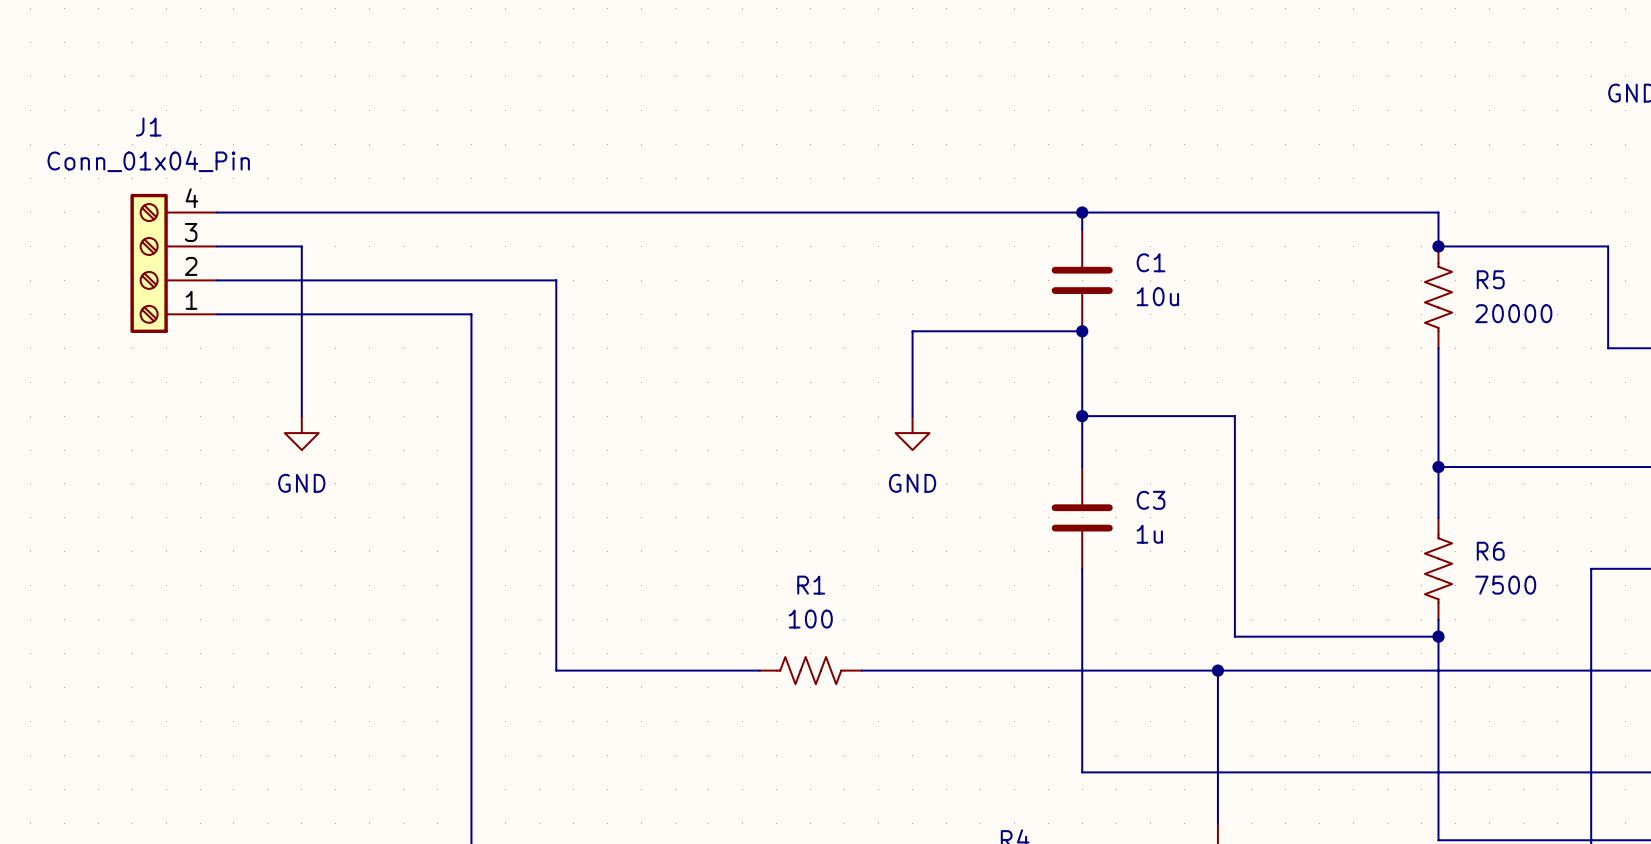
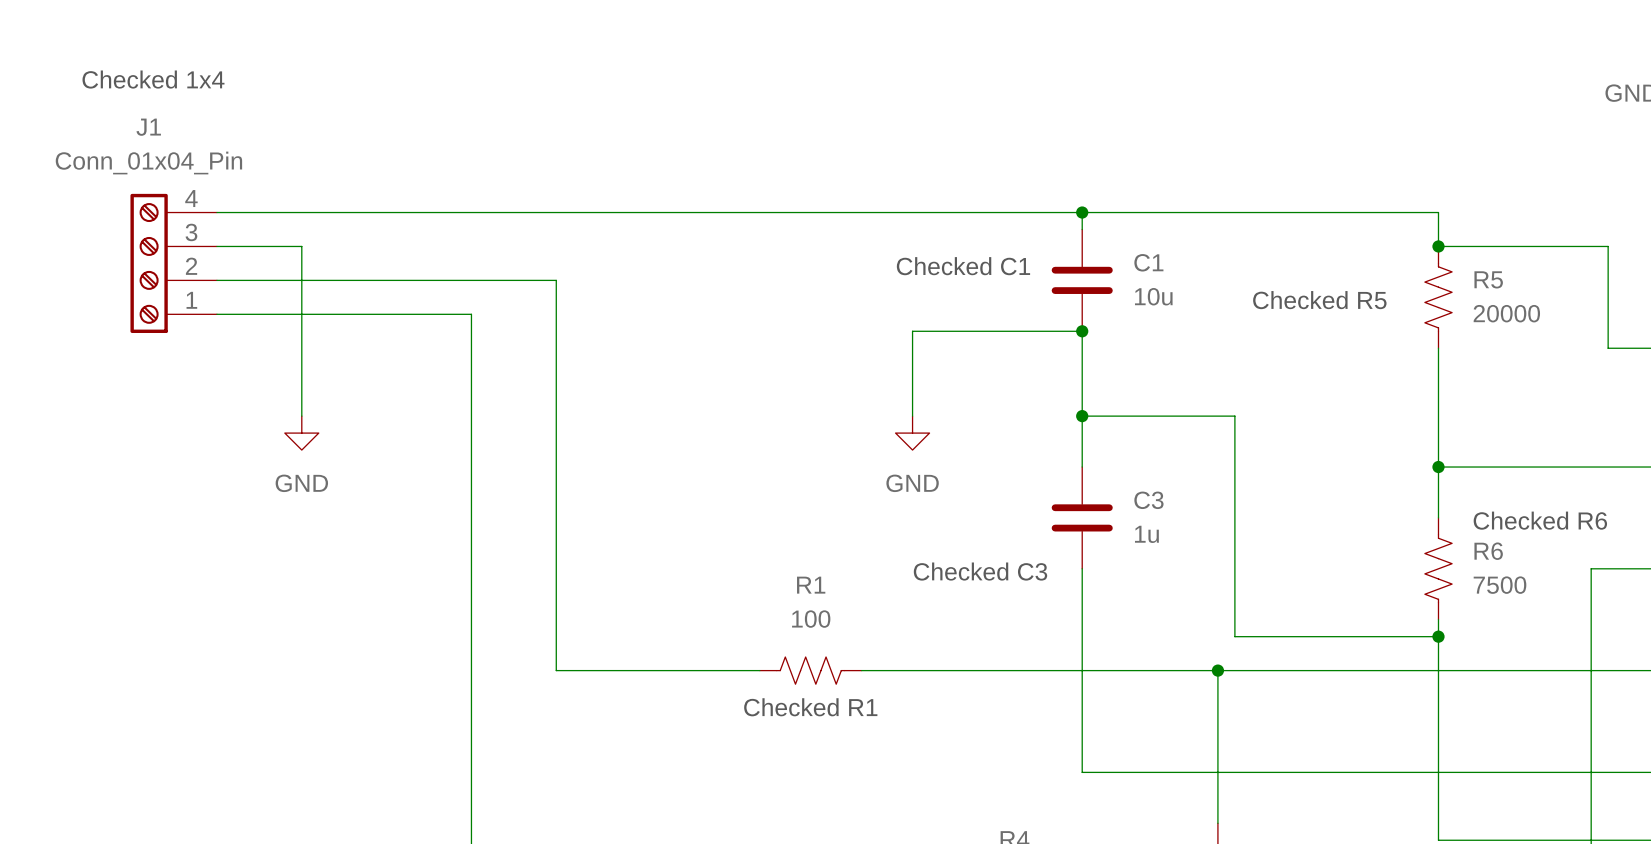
text: none -> Checked 1x4 (153, 79)
text: none -> Checked C1 (963, 266)
text: none -> Checked R5 (1319, 300)
text: none -> Checked R6 (1540, 520)
text: none -> Checked C3 (980, 571)
text: none -> Checked R1 (810, 707)

